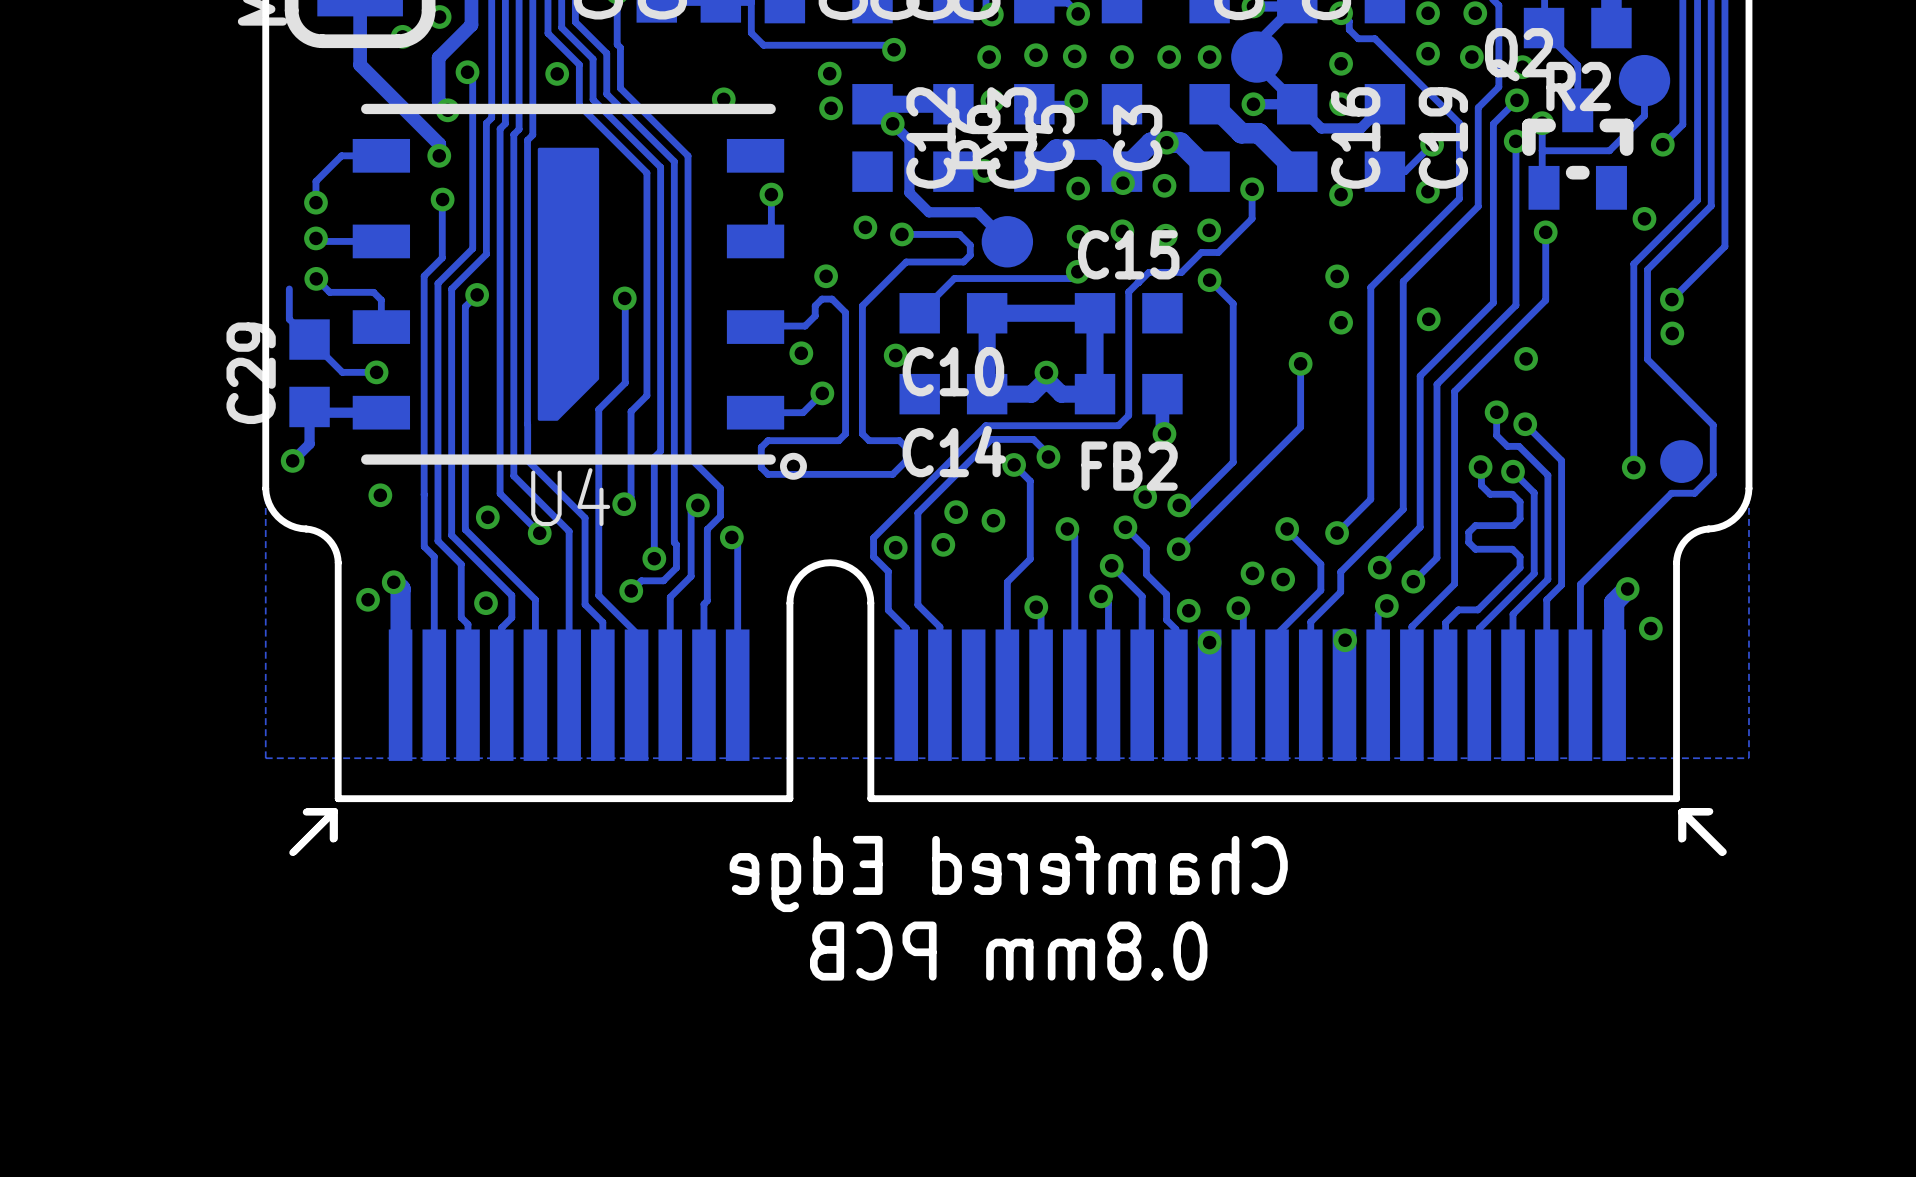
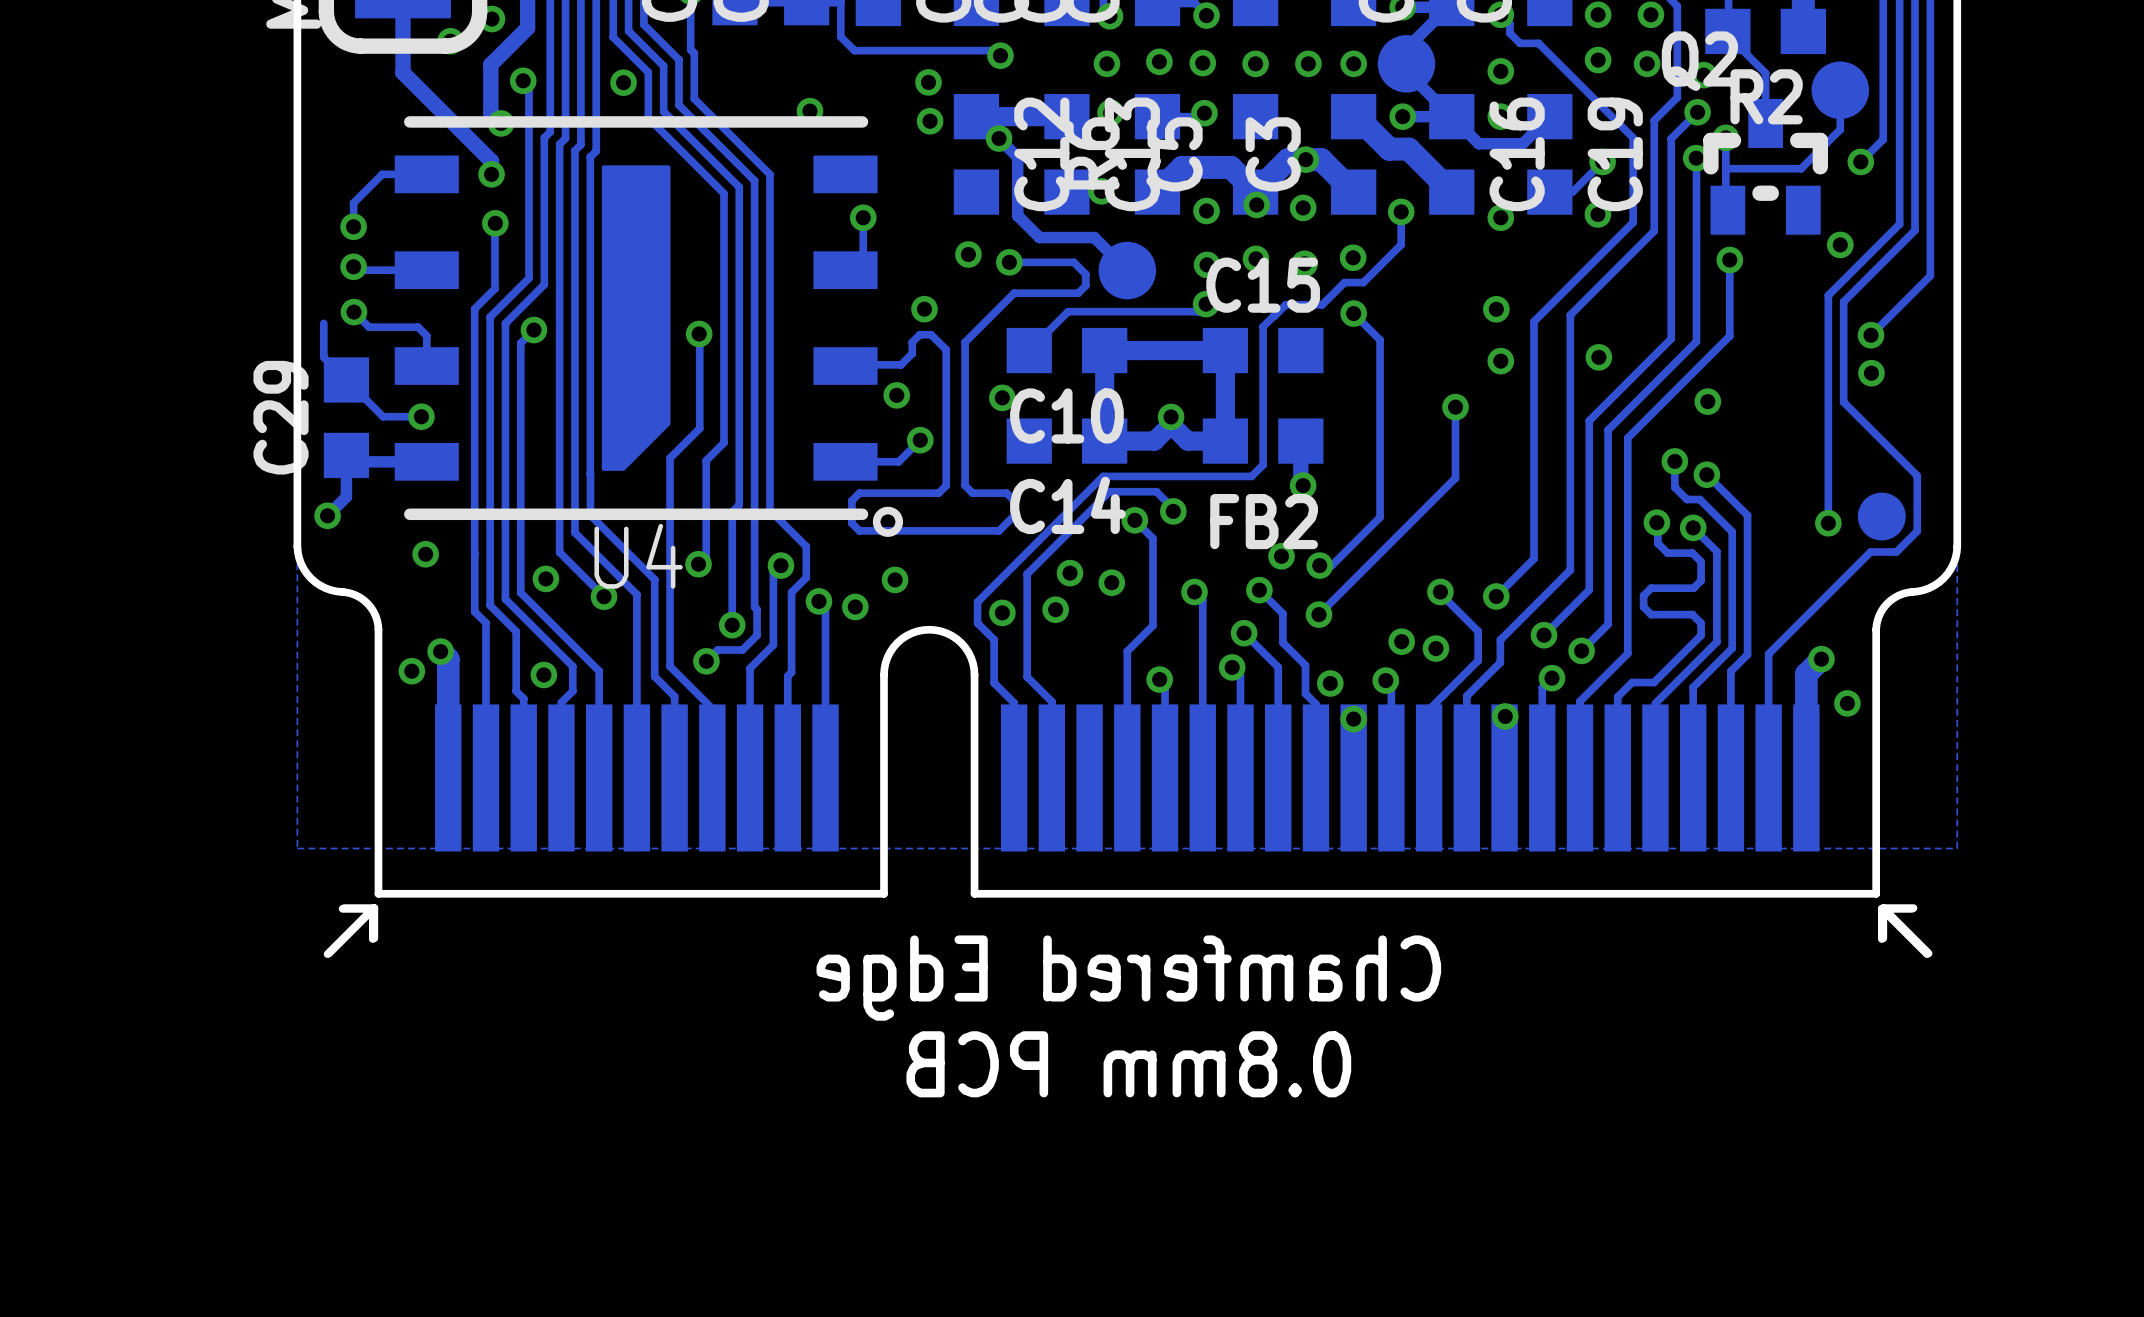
via: none -> (895, 579)
via: none -> (855, 606)

